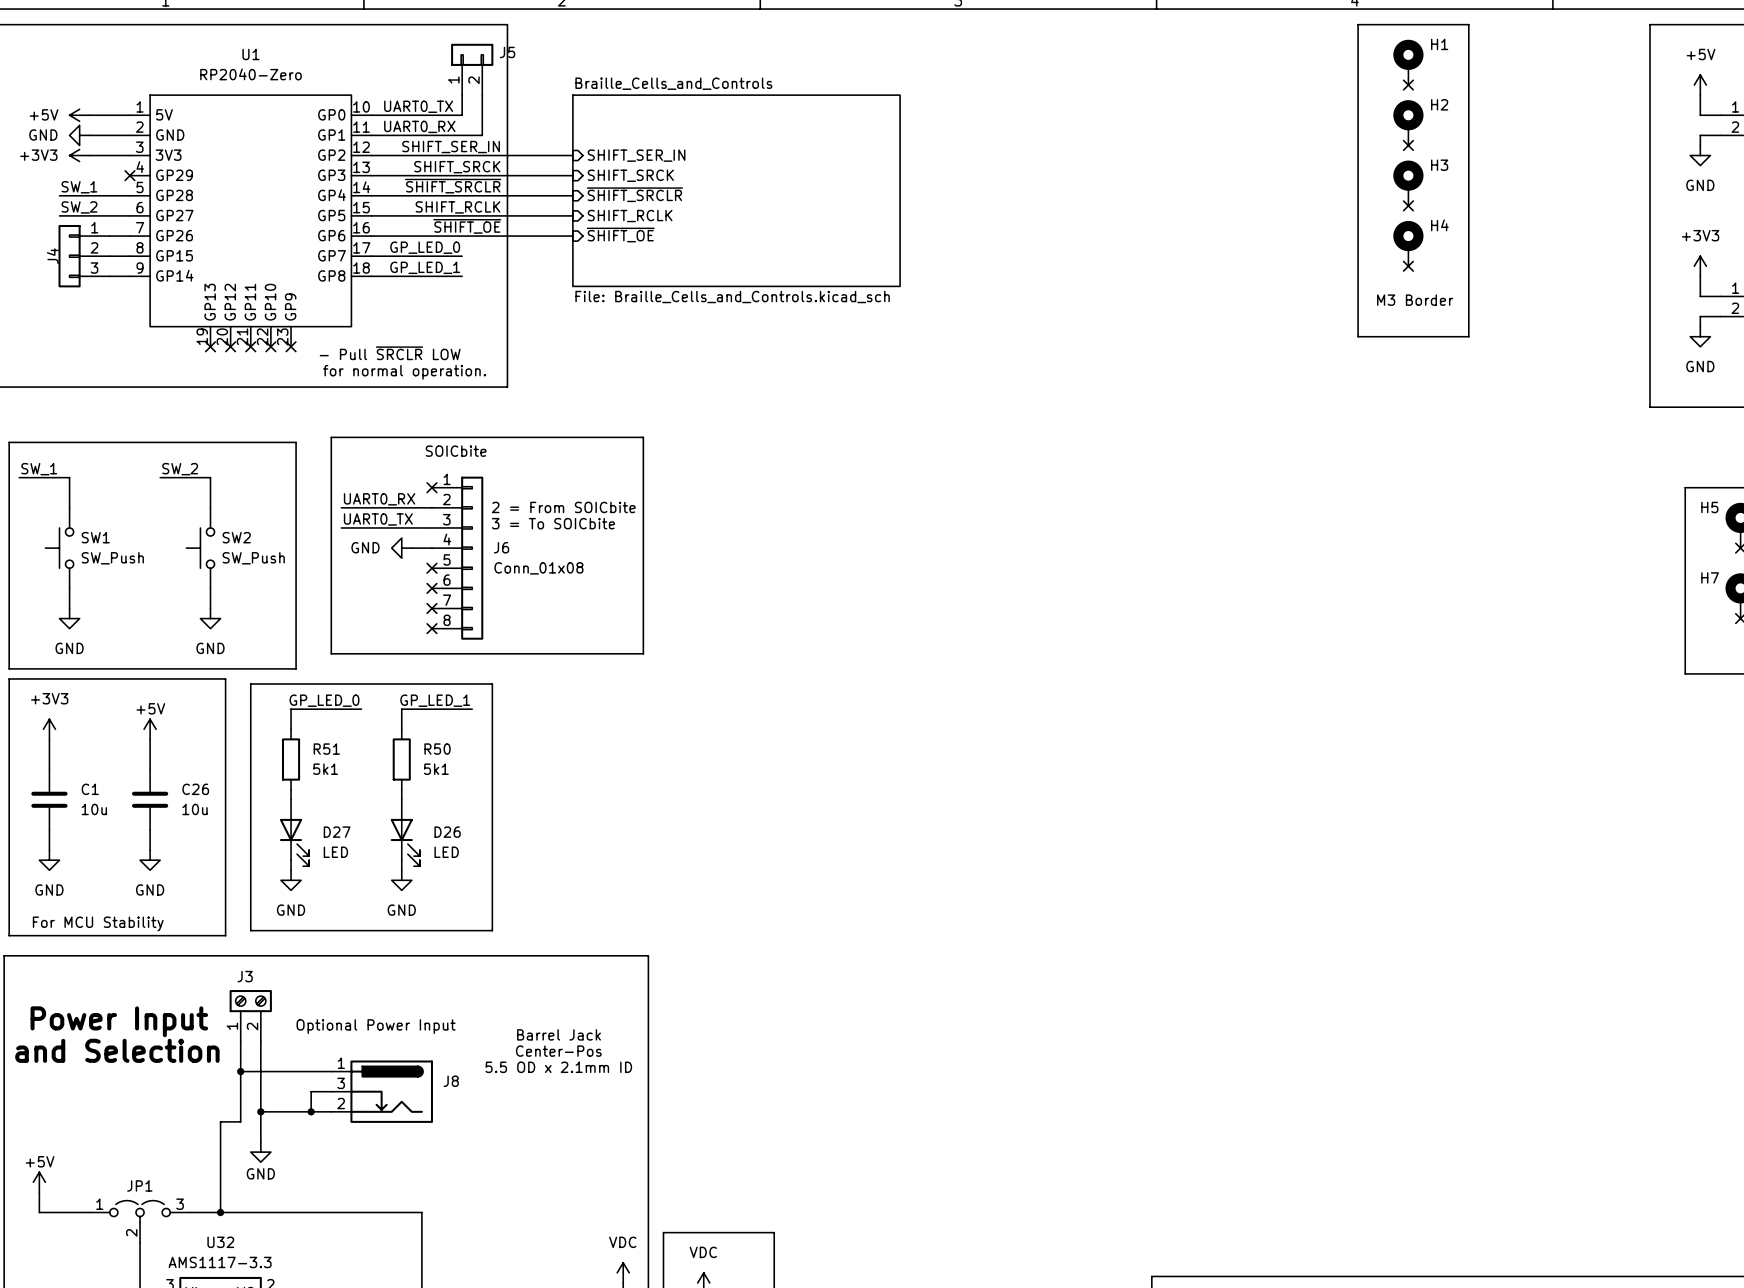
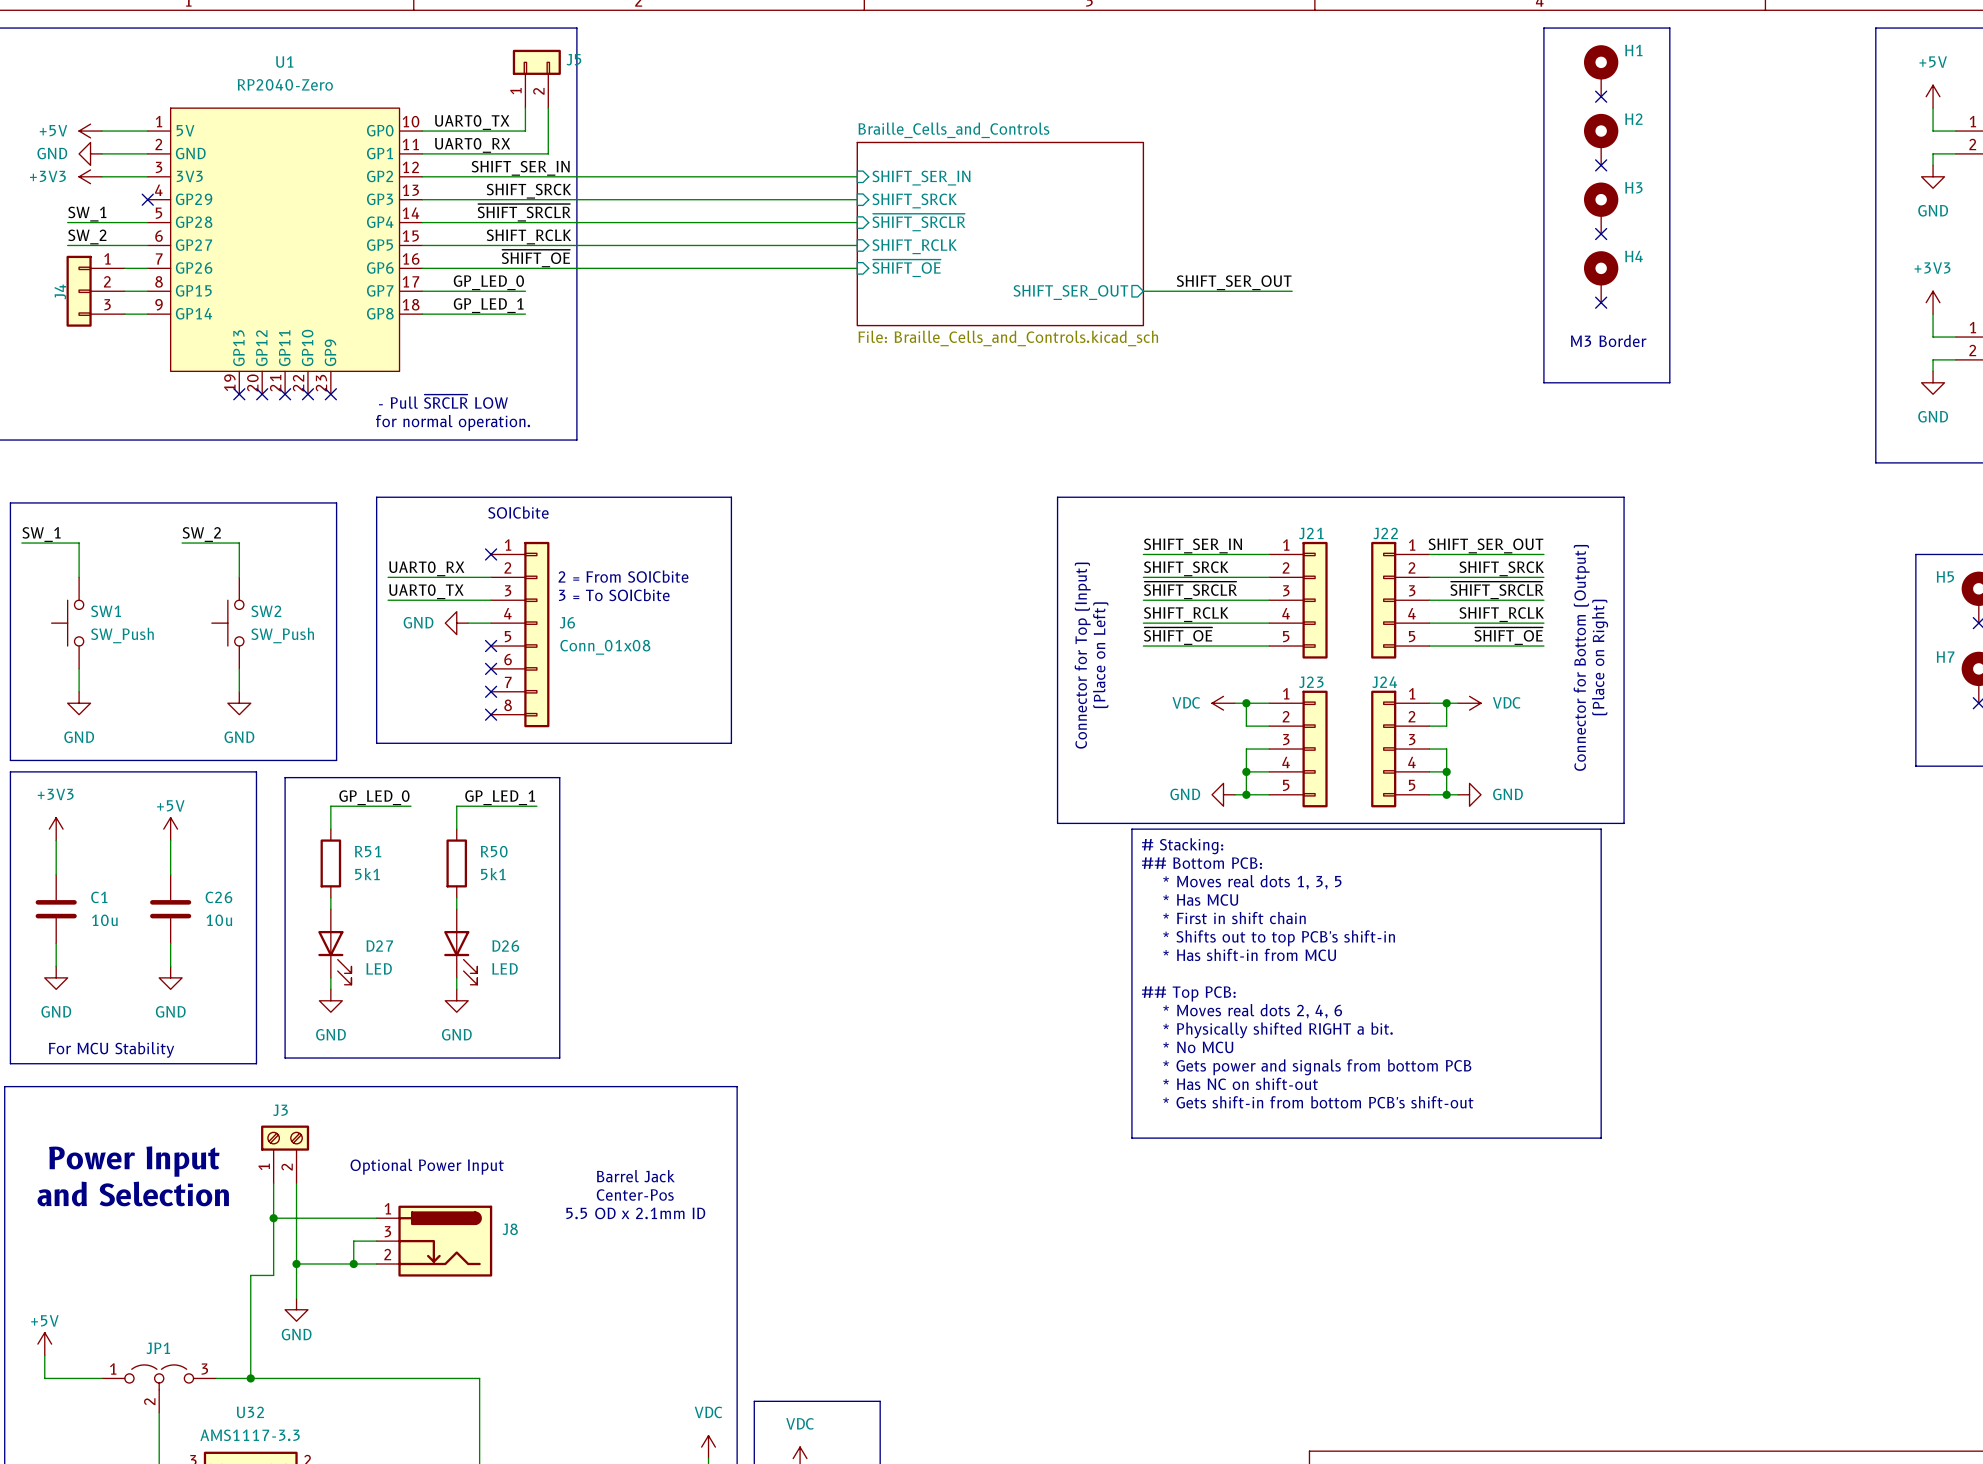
wire: none -> (651, 176) (857, 176)
sheet pin position: SHIFT_SER_IN (636, 155) -> SHIFT_SER_IN (921, 178)
wire: none -> (651, 199) (857, 199)
sheet pin position: SHIFT_SRCK (630, 175) -> SHIFT_SRCK (914, 200)
sheet Braille_Cells_and_Controls: File: Braille_Cells_and_Controls.kicad_sch (736, 190) -> none
sheet pin position: ~{SHIFT_SRCLR} (634, 194) -> ~{SHIFT_SRCLR} (918, 222)
wire: none -> (651, 222) (857, 222)
sheet Braille_Cells_and_Controls: none -> File: Braille_Cells_and_Controls.kicad_sch (1000, 234)
wire: none -> (651, 245) (857, 245)
sheet pin position: SHIFT_RCLK (630, 216) -> SHIFT_RCLK (914, 246)
sheet pin position: ~{SHIFT_OE} (620, 235) -> ~{SHIFT_OE} (906, 268)
wire: none -> (651, 268) (857, 268)
label: none -> SHIFT_SER_OUT (1234, 282)
sheet pin: none -> SHIFT_SER_OUT (1070, 292)
wire: none -> (1143, 291) (1292, 291)
line: none -> (1057, 497) (1624, 497) (1624, 823) (1057, 823) (1057, 497)
label: none -> SHIFT_SER_IN (1193, 545)
label: none -> SHIFT_SER_OUT (1485, 545)
wire: none -> (1143, 554) (1269, 554)
wire: none -> (1429, 554) (1543, 554)
label: none -> SHIFT_SRCK (1186, 568)
label: none -> SHIFT_SRCK (1501, 568)
wire: none -> (1143, 577) (1269, 577)
wire: none -> (1429, 577) (1543, 577)
label: none -> ~{SHIFT_SRCLR} (1190, 590)
label: none -> ~{SHIFT_SRCLR} (1496, 590)
wire: none -> (1143, 600) (1269, 600)
J21: none -> (1298, 600)
J22: none -> (1400, 600)
wire: none -> (1429, 600) (1543, 600)
label: none -> SHIFT_RCLK (1186, 614)
label: none -> SHIFT_RCLK (1501, 614)
wire: none -> (1143, 623) (1269, 623)
wire: none -> (1429, 623) (1543, 623)
label: none -> ~{SHIFT_OE} (1178, 636)
label: none -> ~{SHIFT_OE} (1508, 636)
wire: none -> (1143, 646) (1269, 646)
wire: none -> (1429, 646) (1543, 646)
text: none -> Connector for Top (Input) (1082, 655)
text: none -> (Place on Left) (1100, 655)
text: none -> Connector for Bottom (Output) (1581, 657)
text: none -> (Place on Right) (1600, 657)
power symbol: none -> VDC (1223, 703)
wire: none -> (1234, 703) (1269, 703)
wire: none -> (1246, 703) (1246, 726) (1269, 726)
junction: none -> (1246, 703)
wire: none -> (1429, 703) (1458, 703)
wire: none -> (1446, 703) (1446, 726) (1429, 726)
junction: none -> (1446, 703)
power symbol: none -> VDC (1469, 703)
wire: none -> (1269, 749) (1246, 749) (1246, 794)
J23: none -> (1298, 749)
J24: none -> (1400, 749)
wire: none -> (1429, 749) (1446, 749) (1446, 794)
wire: none -> (1246, 771) (1269, 771)
junction: none -> (1246, 771)
wire: none -> (1429, 771) (1446, 771)
junction: none -> (1446, 771)
power symbol: none -> GND (1223, 794)
wire: none -> (1234, 794) (1269, 794)
junction: none -> (1246, 794)
wire: none -> (1429, 794) (1458, 794)
junction: none -> (1446, 794)
power symbol: none -> GND (1469, 794)
line: none -> (1131, 829) (1601, 829) (1601, 1138) (1131, 1138) (1131, 829)
text: none -> # Stacking: (1182, 846)
text: none -> ## Bottom PCB: (1202, 863)
text: none -> * Moves real dots 1, 3, 5 (1252, 882)
text: none -> * Has MCU (1200, 900)
text: none -> * First in shift chain (1234, 918)
text: none -> * Shifts out to top PCB's shift-in (1279, 938)
text: none -> * Has shift-in from MCU (1249, 954)
text: none -> ## Top PCB: (1188, 993)
text: none -> * Moves real dots 2, 4, 6 (1252, 1011)
text: none -> * Physically shifted RIGHT a bit. (1278, 1030)
text: none -> * No MCU (1198, 1047)
text: none -> * Gets power and signals from bottom PCB (1317, 1067)
text: none -> * Has NC on shift-out (1240, 1083)
text: none -> * Gets shift-in from bottom PCB's shift-out (1318, 1102)

